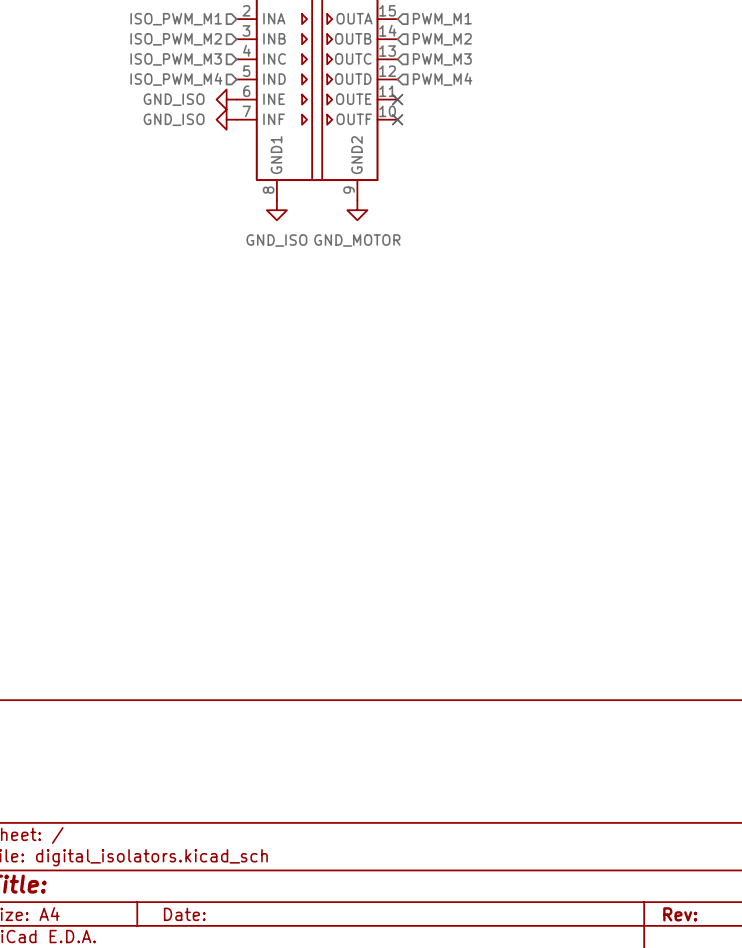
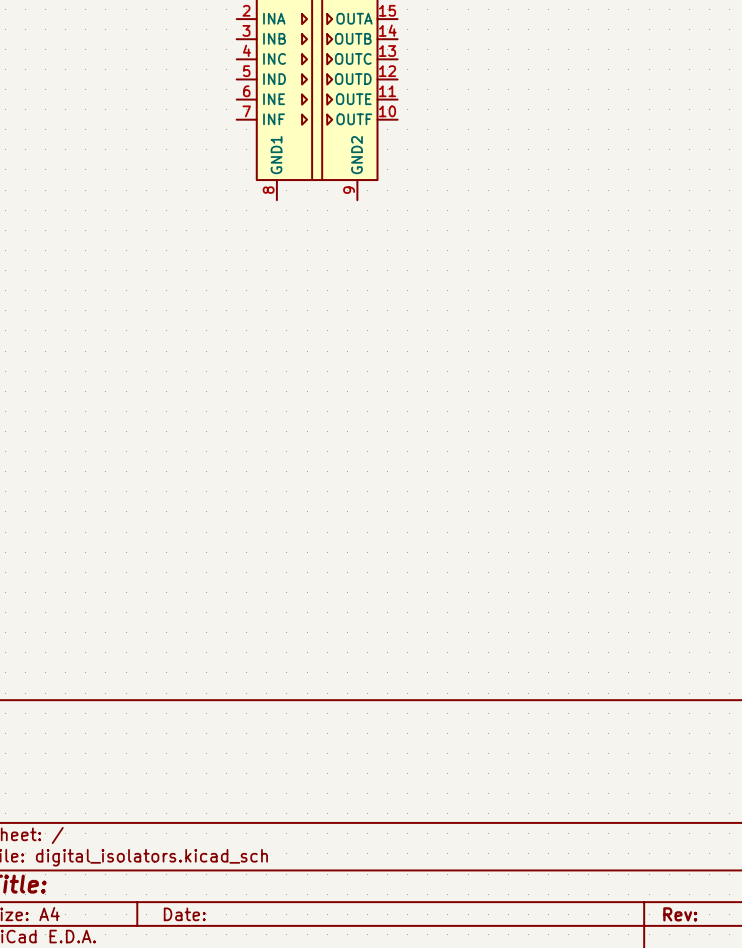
hierarchical label: ISO_PWM_M1 (176, 19) -> none
hierarchical label: PWM_M1 (442, 19) -> none
hierarchical label: ISO_PWM_M2 (176, 39) -> none
hierarchical label: PWM_M2 (442, 39) -> none
hierarchical label: ISO_PWM_M3 (176, 59) -> none
hierarchical label: PWM_M3 (442, 59) -> none
hierarchical label: ISO_PWM_M4 (176, 79) -> none
hierarchical label: PWM_M4 (442, 79) -> none
power symbol: GND_ISO (226, 99) -> none
no-connect mark: (397, 99) -> none
power symbol: GND_ISO (226, 119) -> none
no-connect mark: (397, 119) -> none
power symbol: GND_ISO (276, 210) -> none
power symbol: GND_MOTOR (357, 210) -> none

